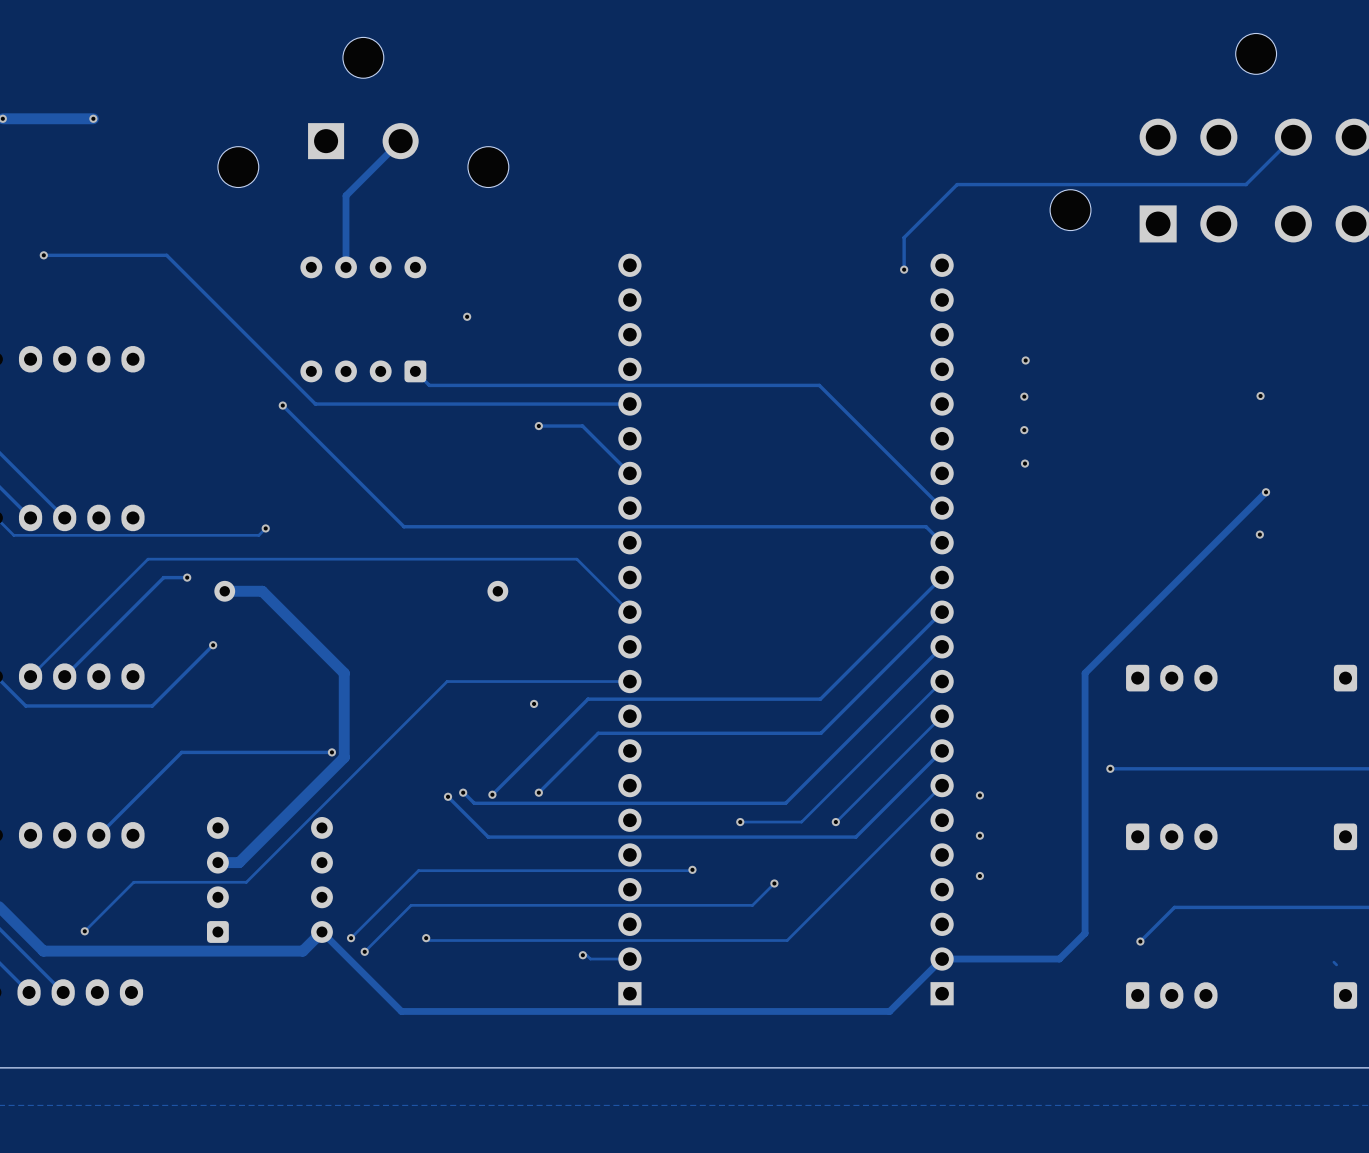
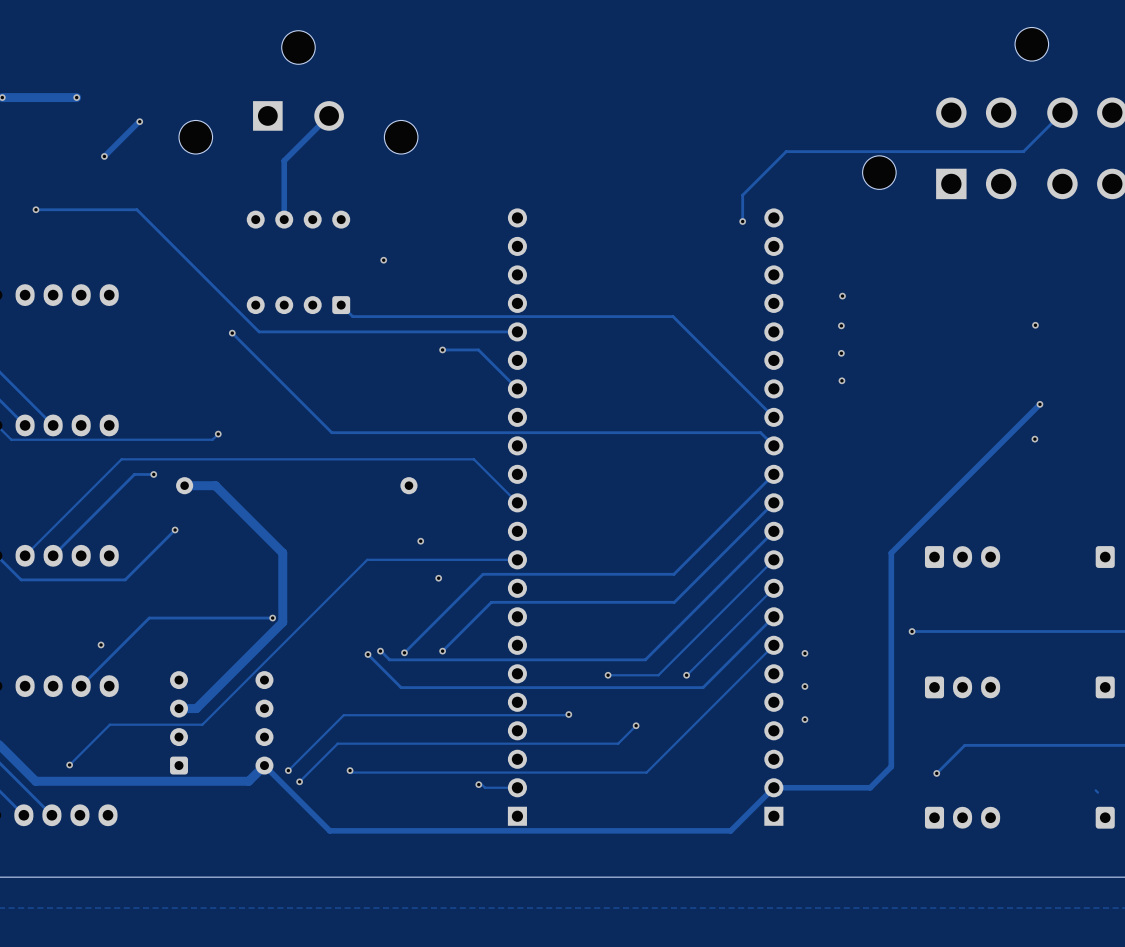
track: none -> (139, 121) (104, 156)
via: none -> (139, 121)
via: none -> (104, 156)
via: none -> (420, 541)
via: none -> (101, 644)

